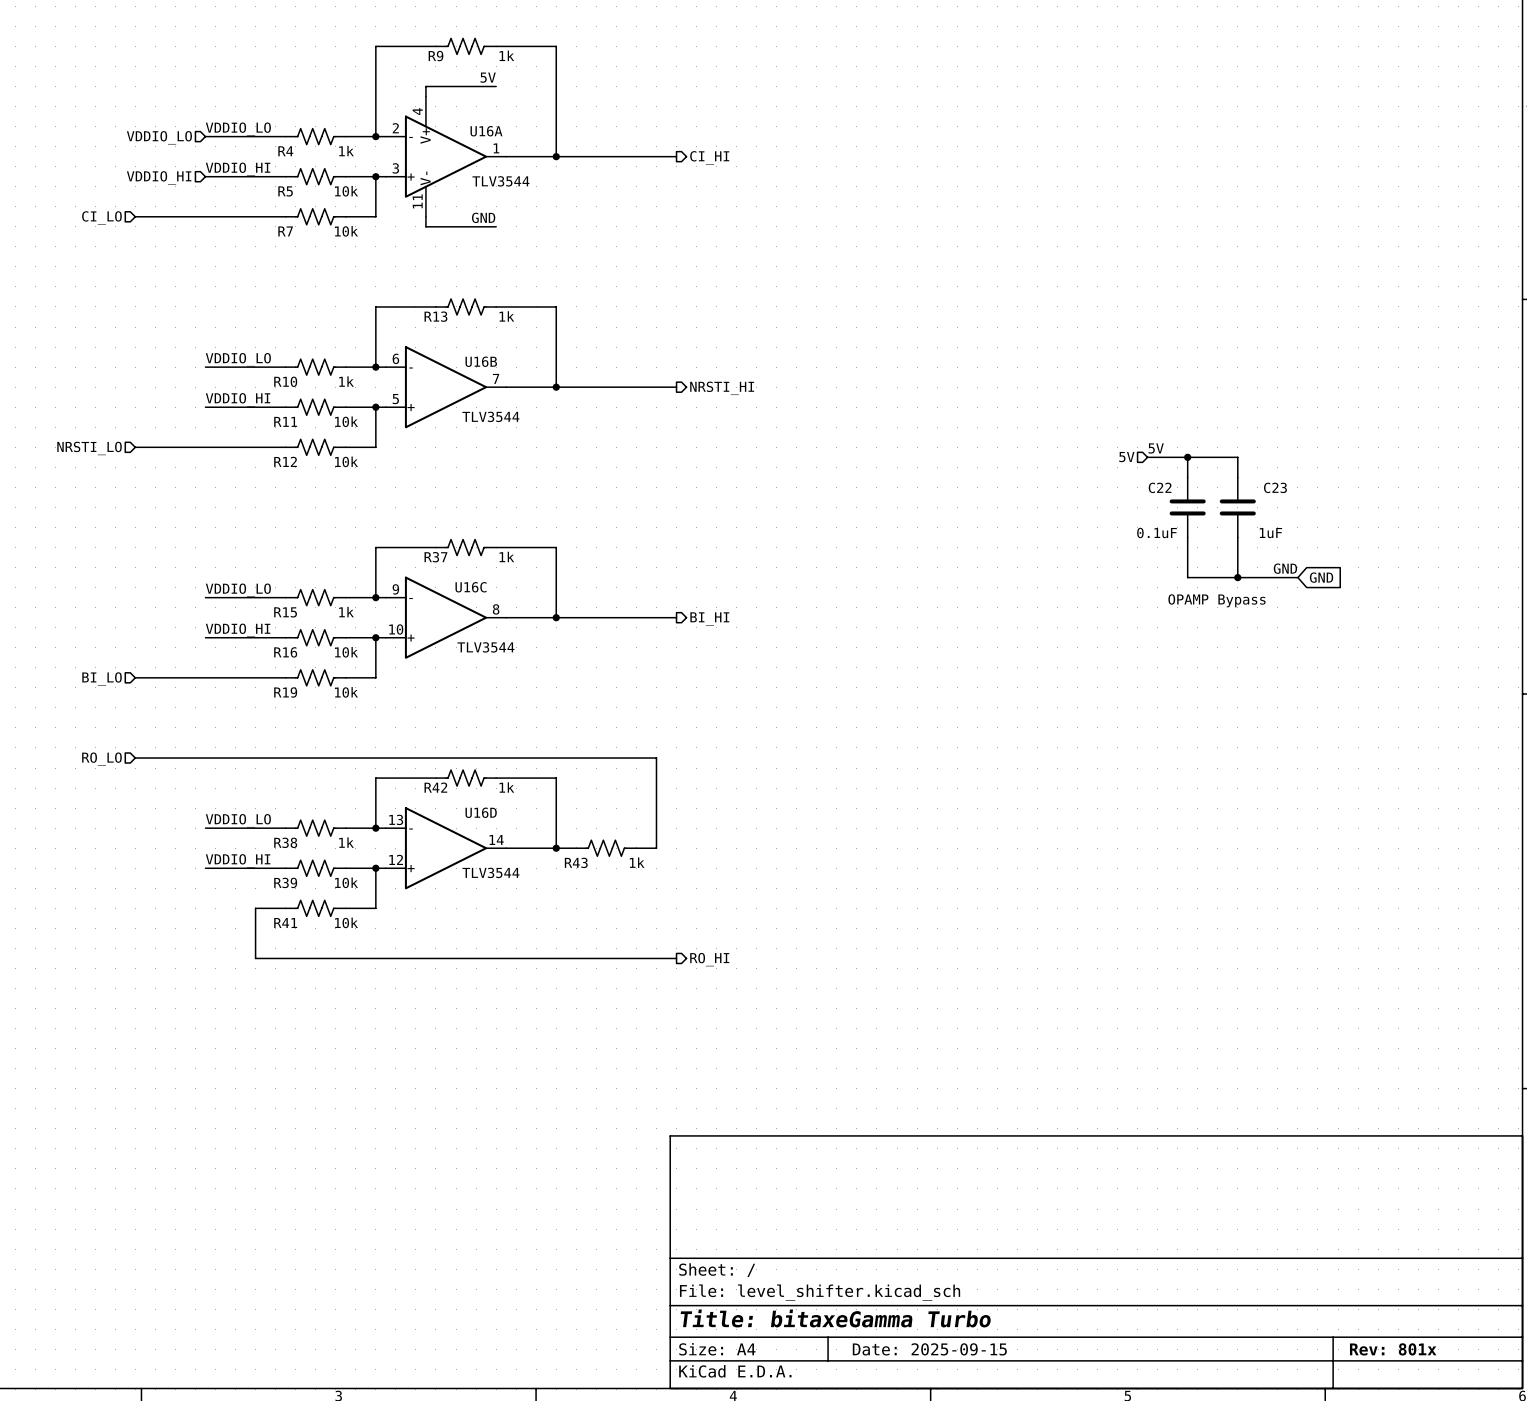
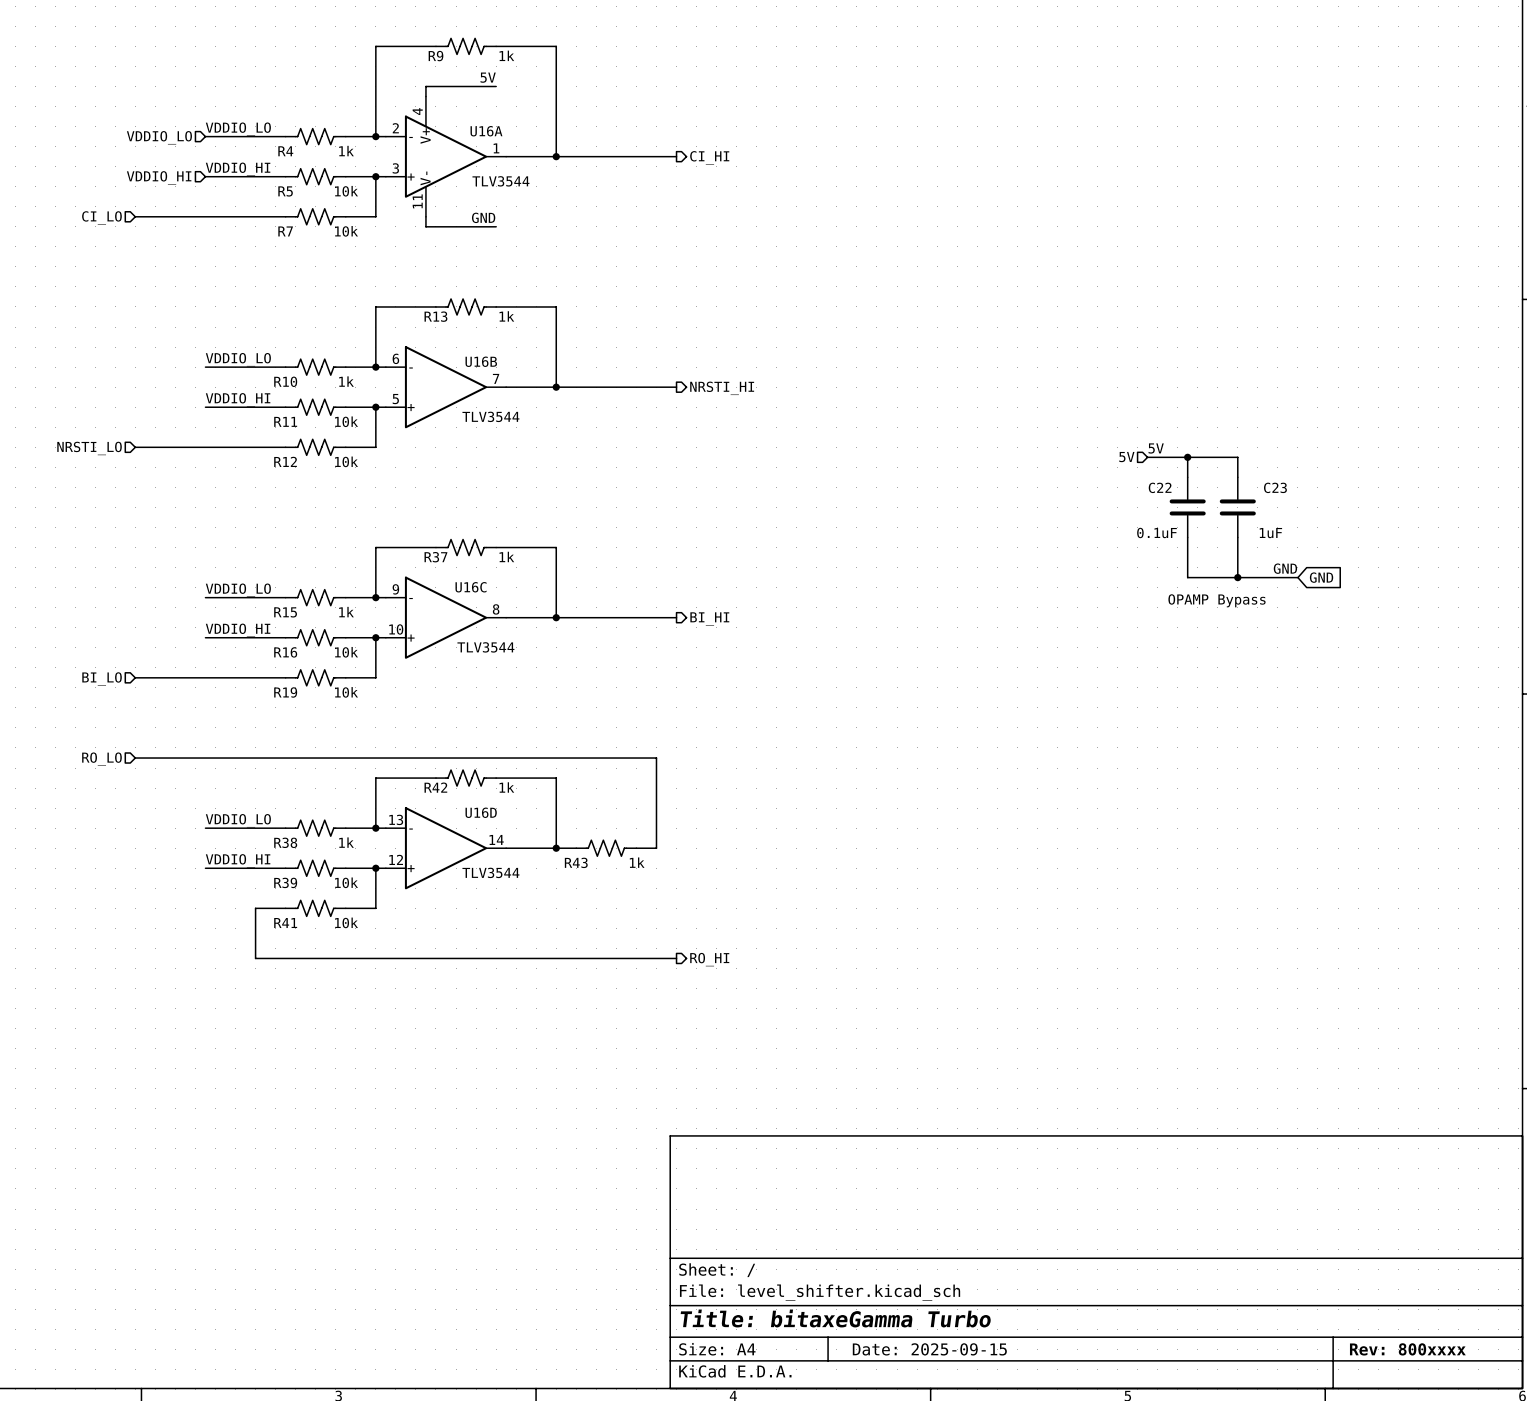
title block: Rev: 801x (1393, 1349) -> Rev: 800xxxx (1407, 1349)

